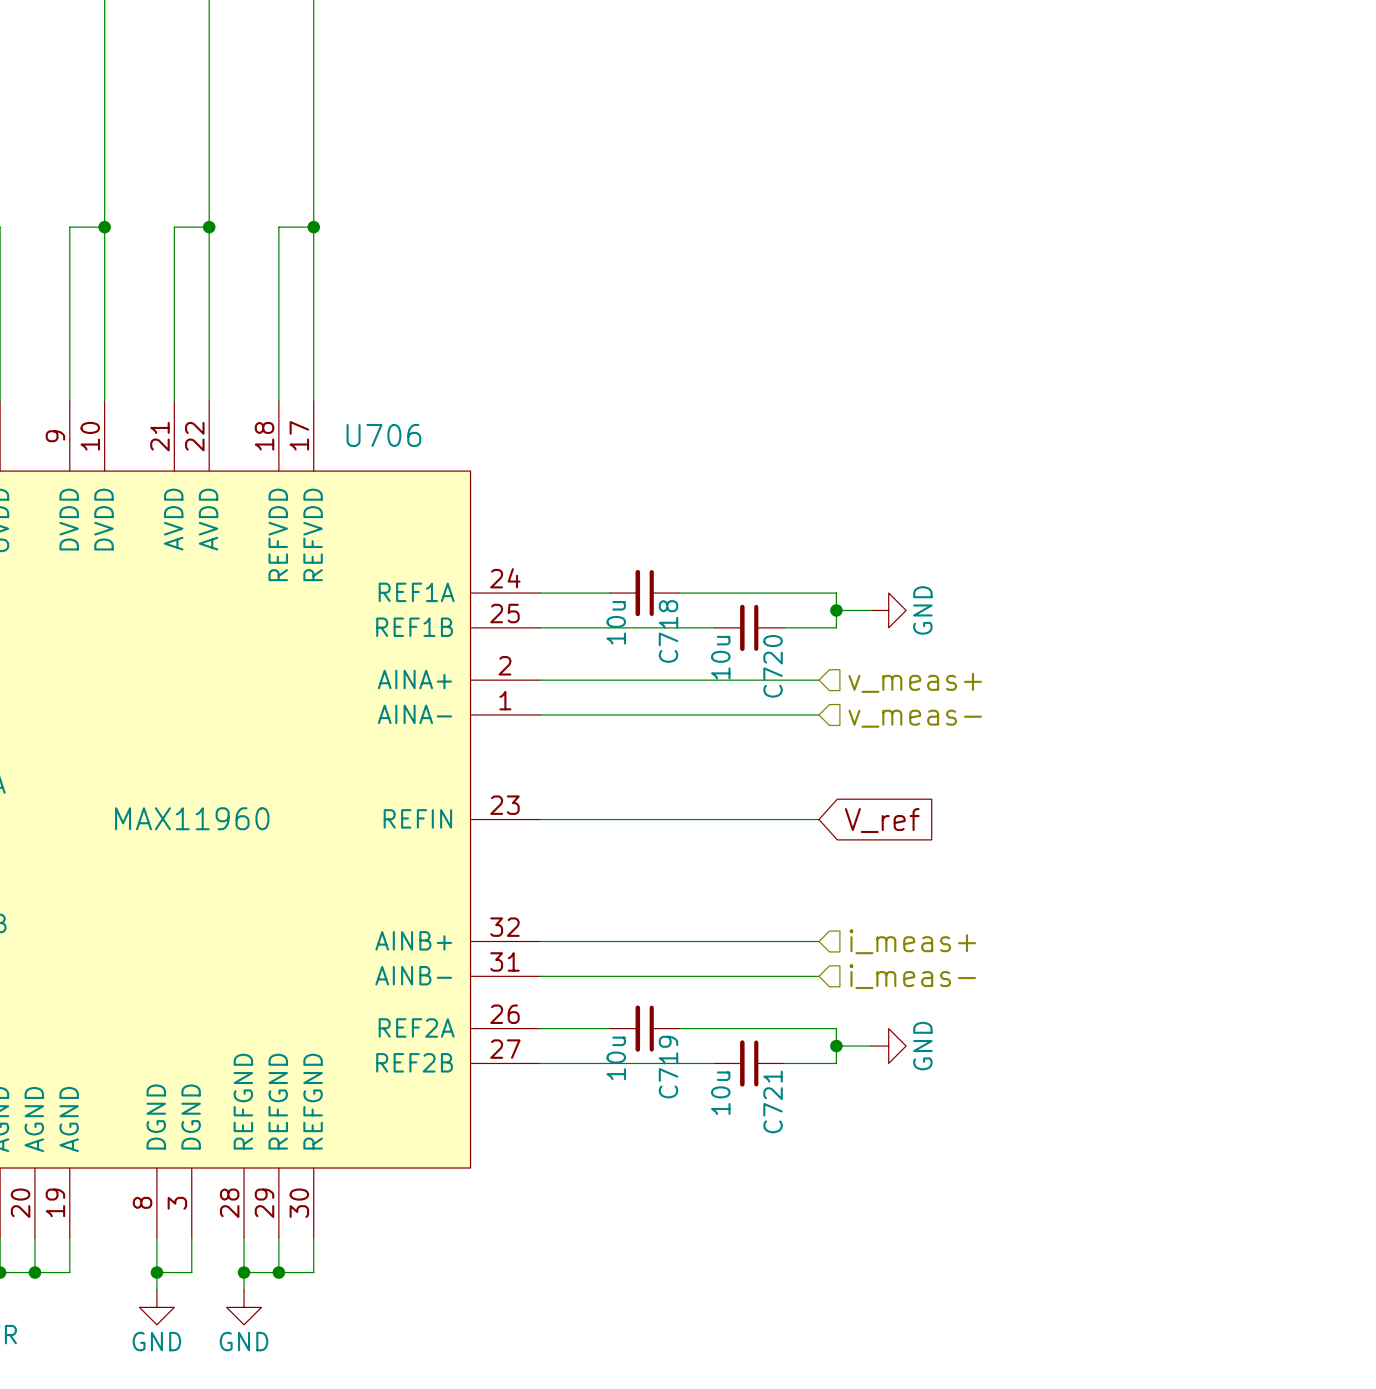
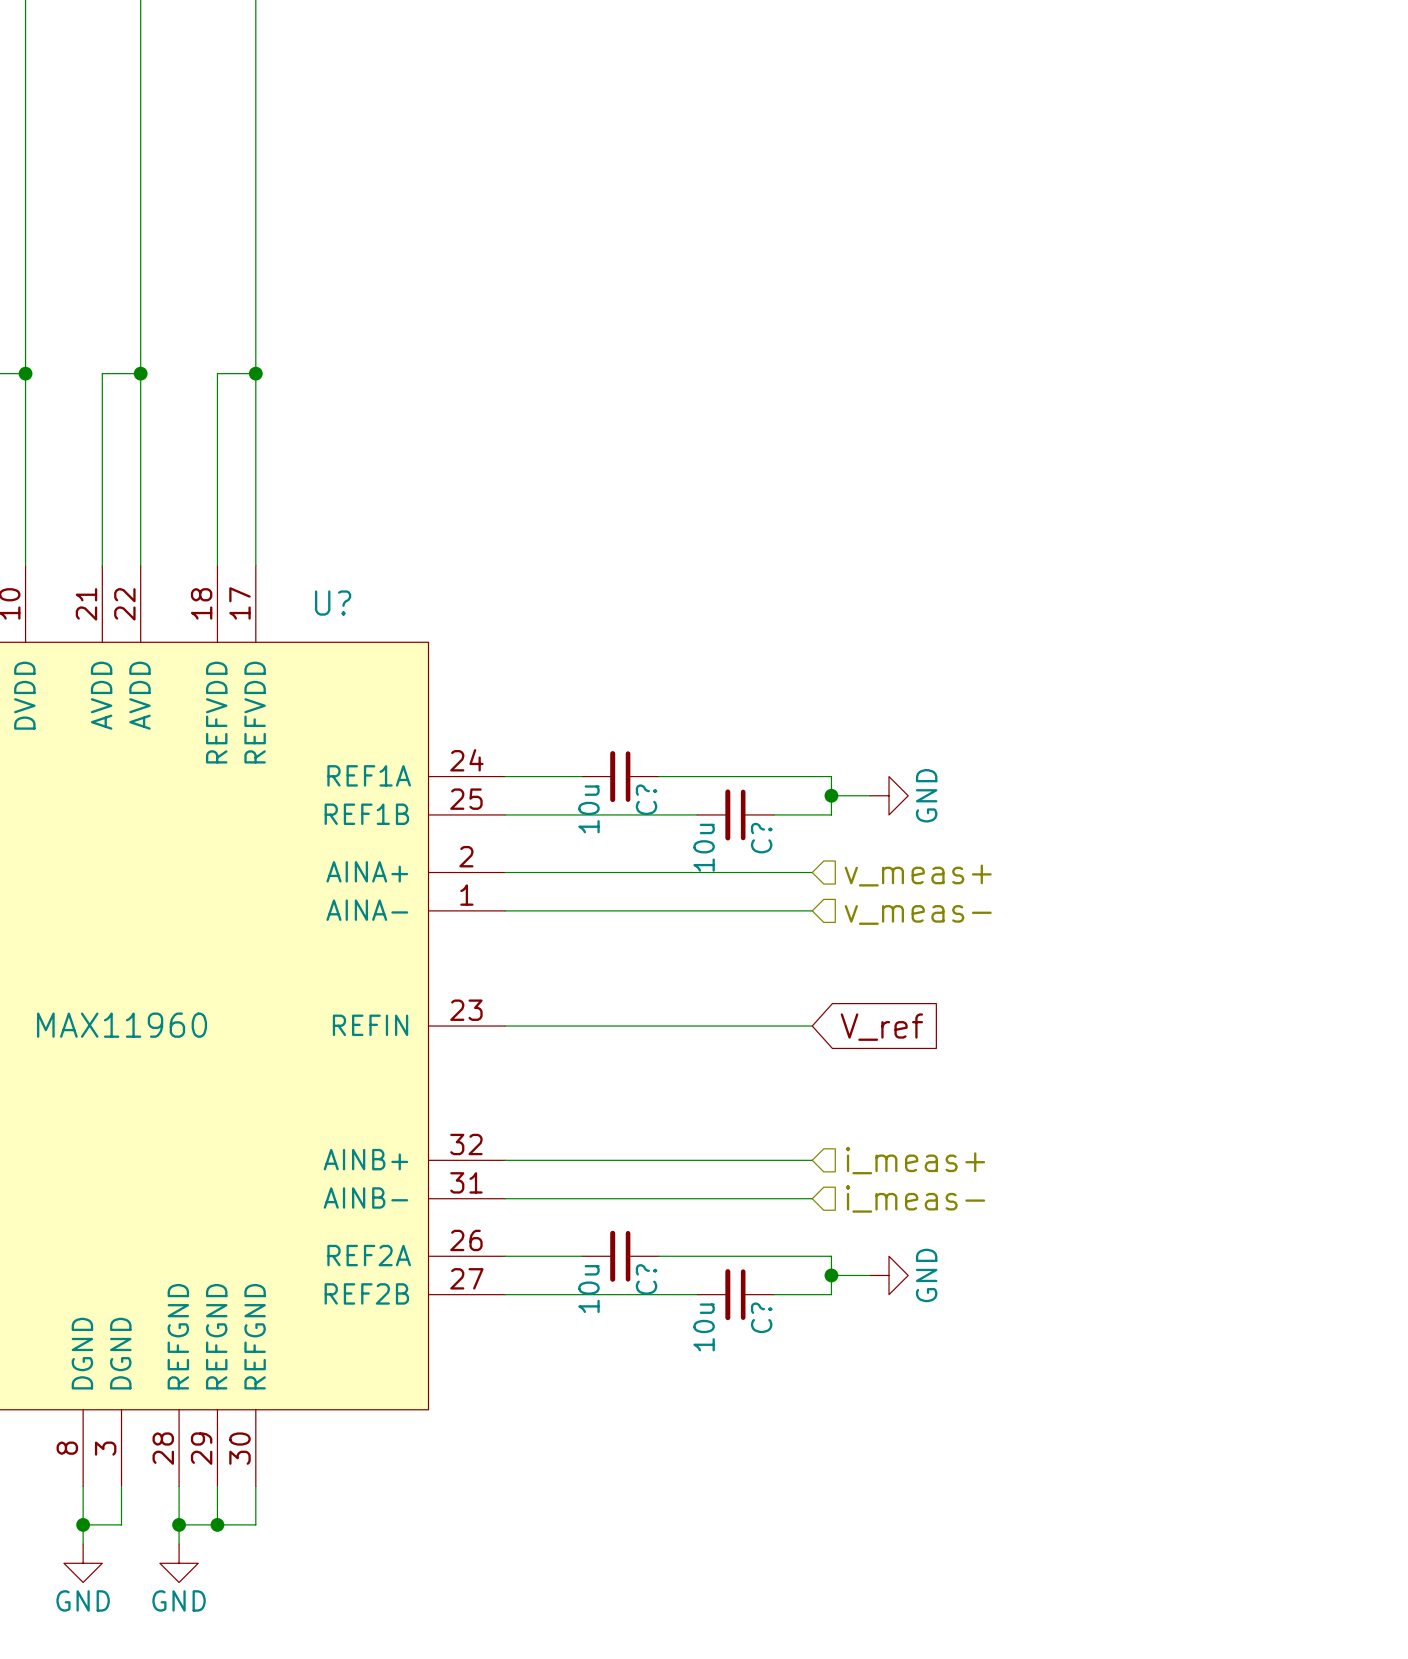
U706 name: U706 (383, 435) -> U? (333, 603)
C718 name: C718 (668, 631) -> C? (646, 799)
C720 name: C720 (773, 666) -> C? (761, 838)
C719 name: C719 (668, 1067) -> C? (646, 1279)
C721 name: C721 (773, 1101) -> C? (761, 1317)

